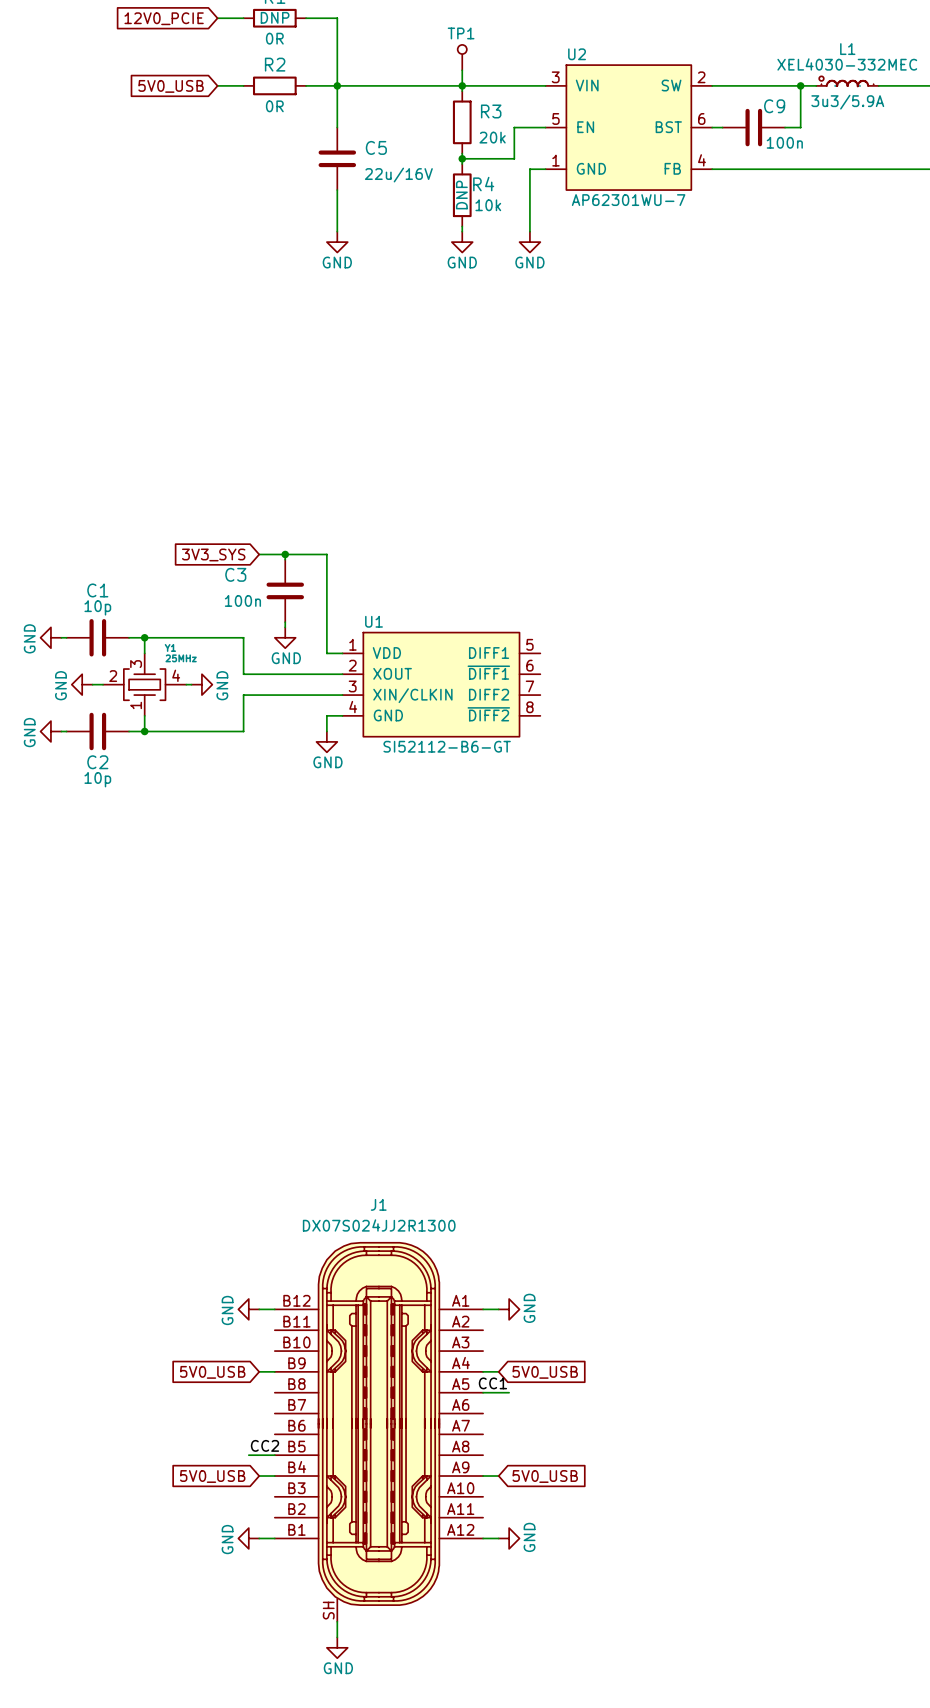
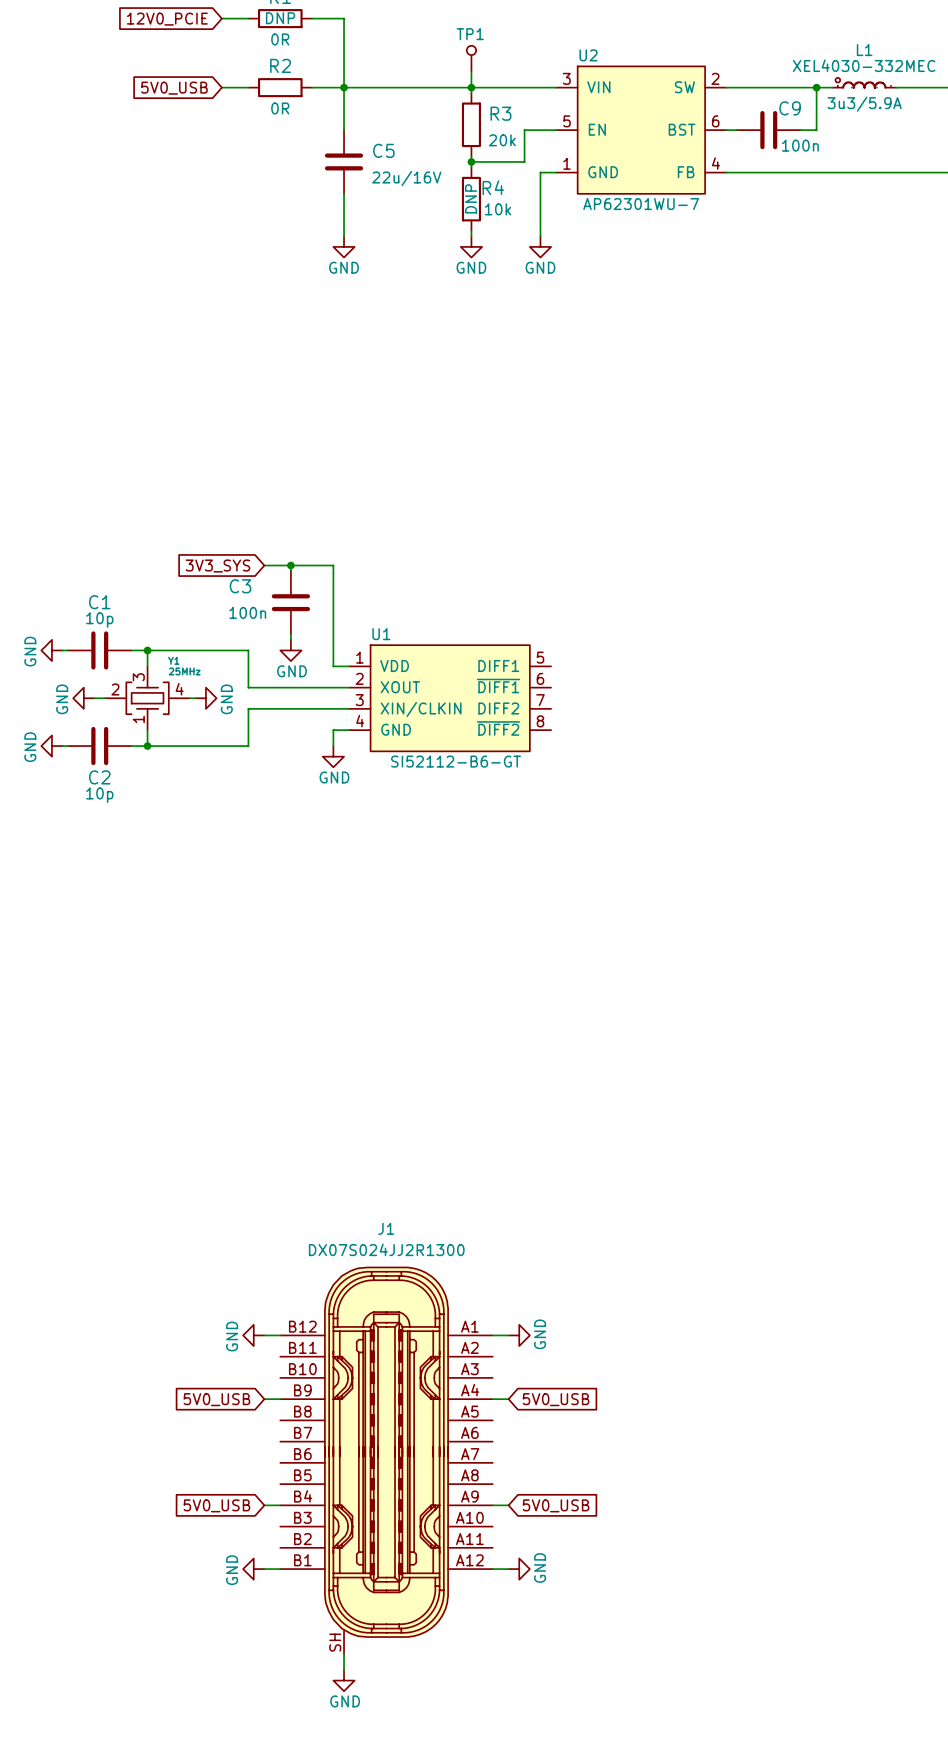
label: CC1 (492, 1383) -> none
wire: (483, 1392) (509, 1392) -> none
label: CC2 (264, 1445) -> none
wire: (248, 1455) (274, 1455) -> none

